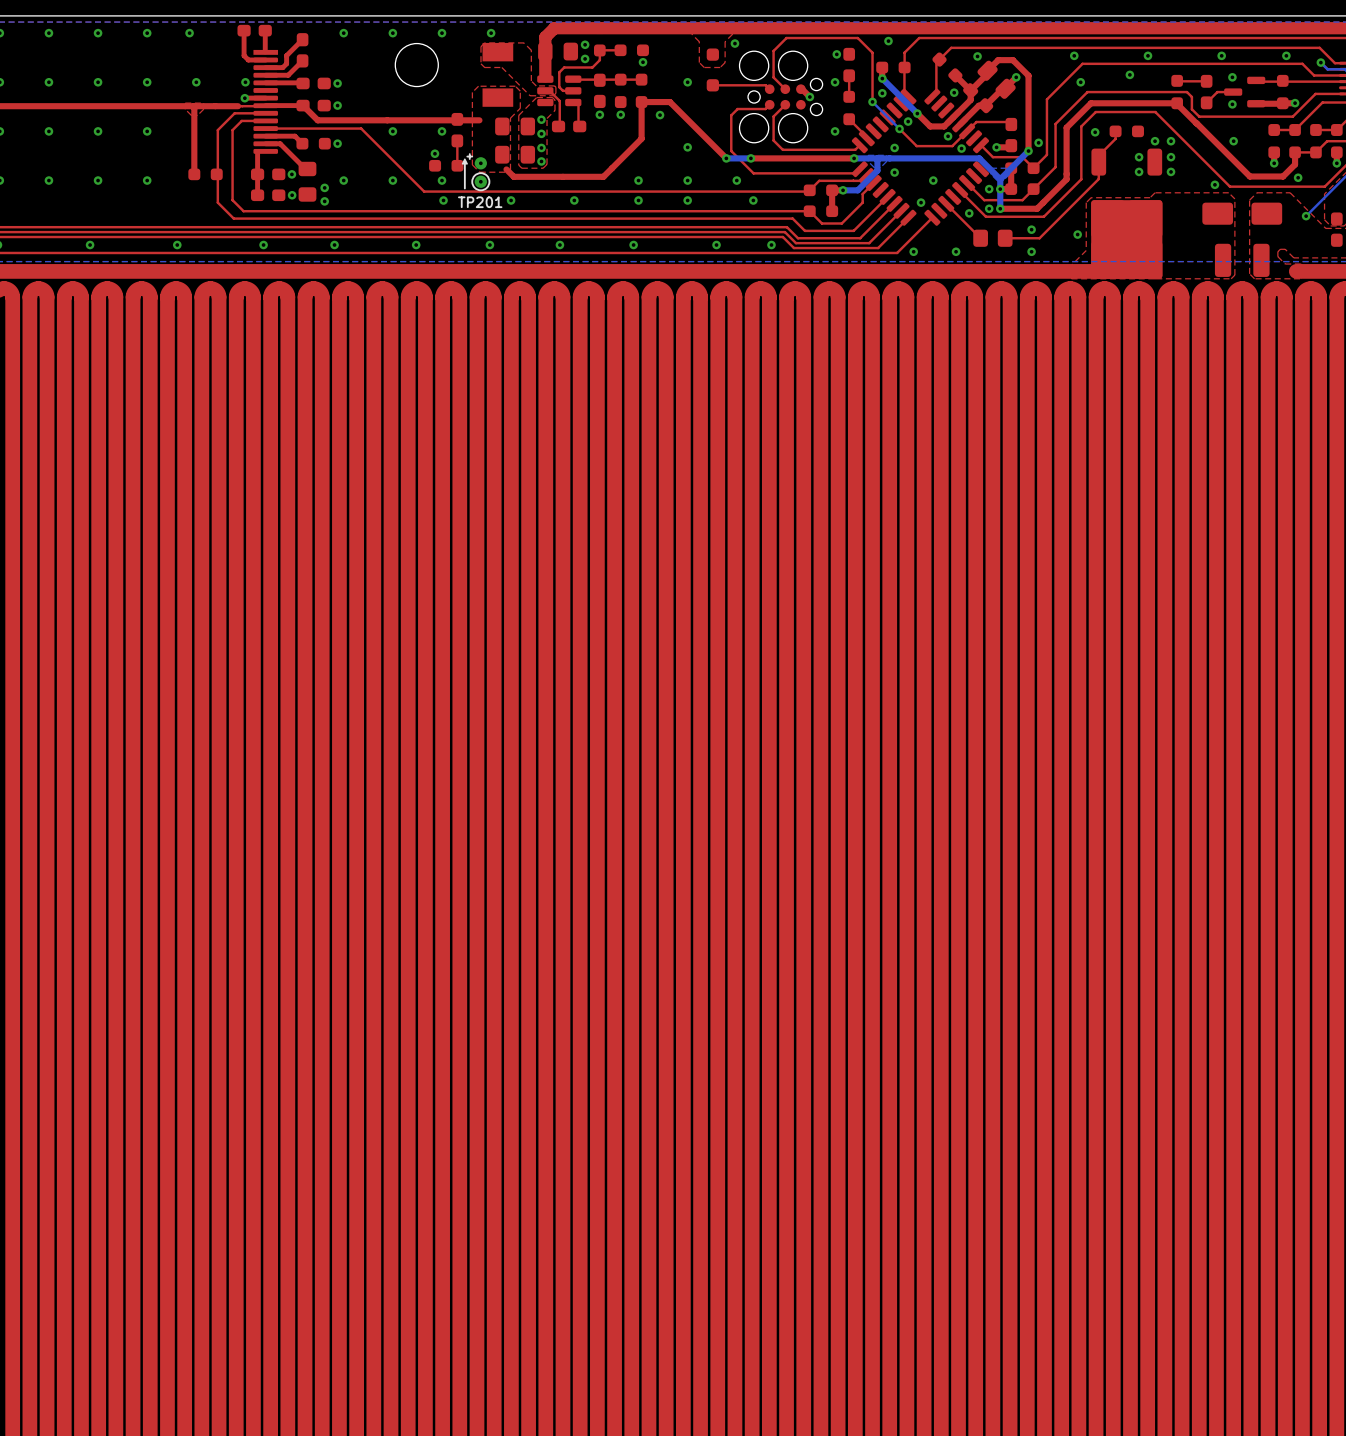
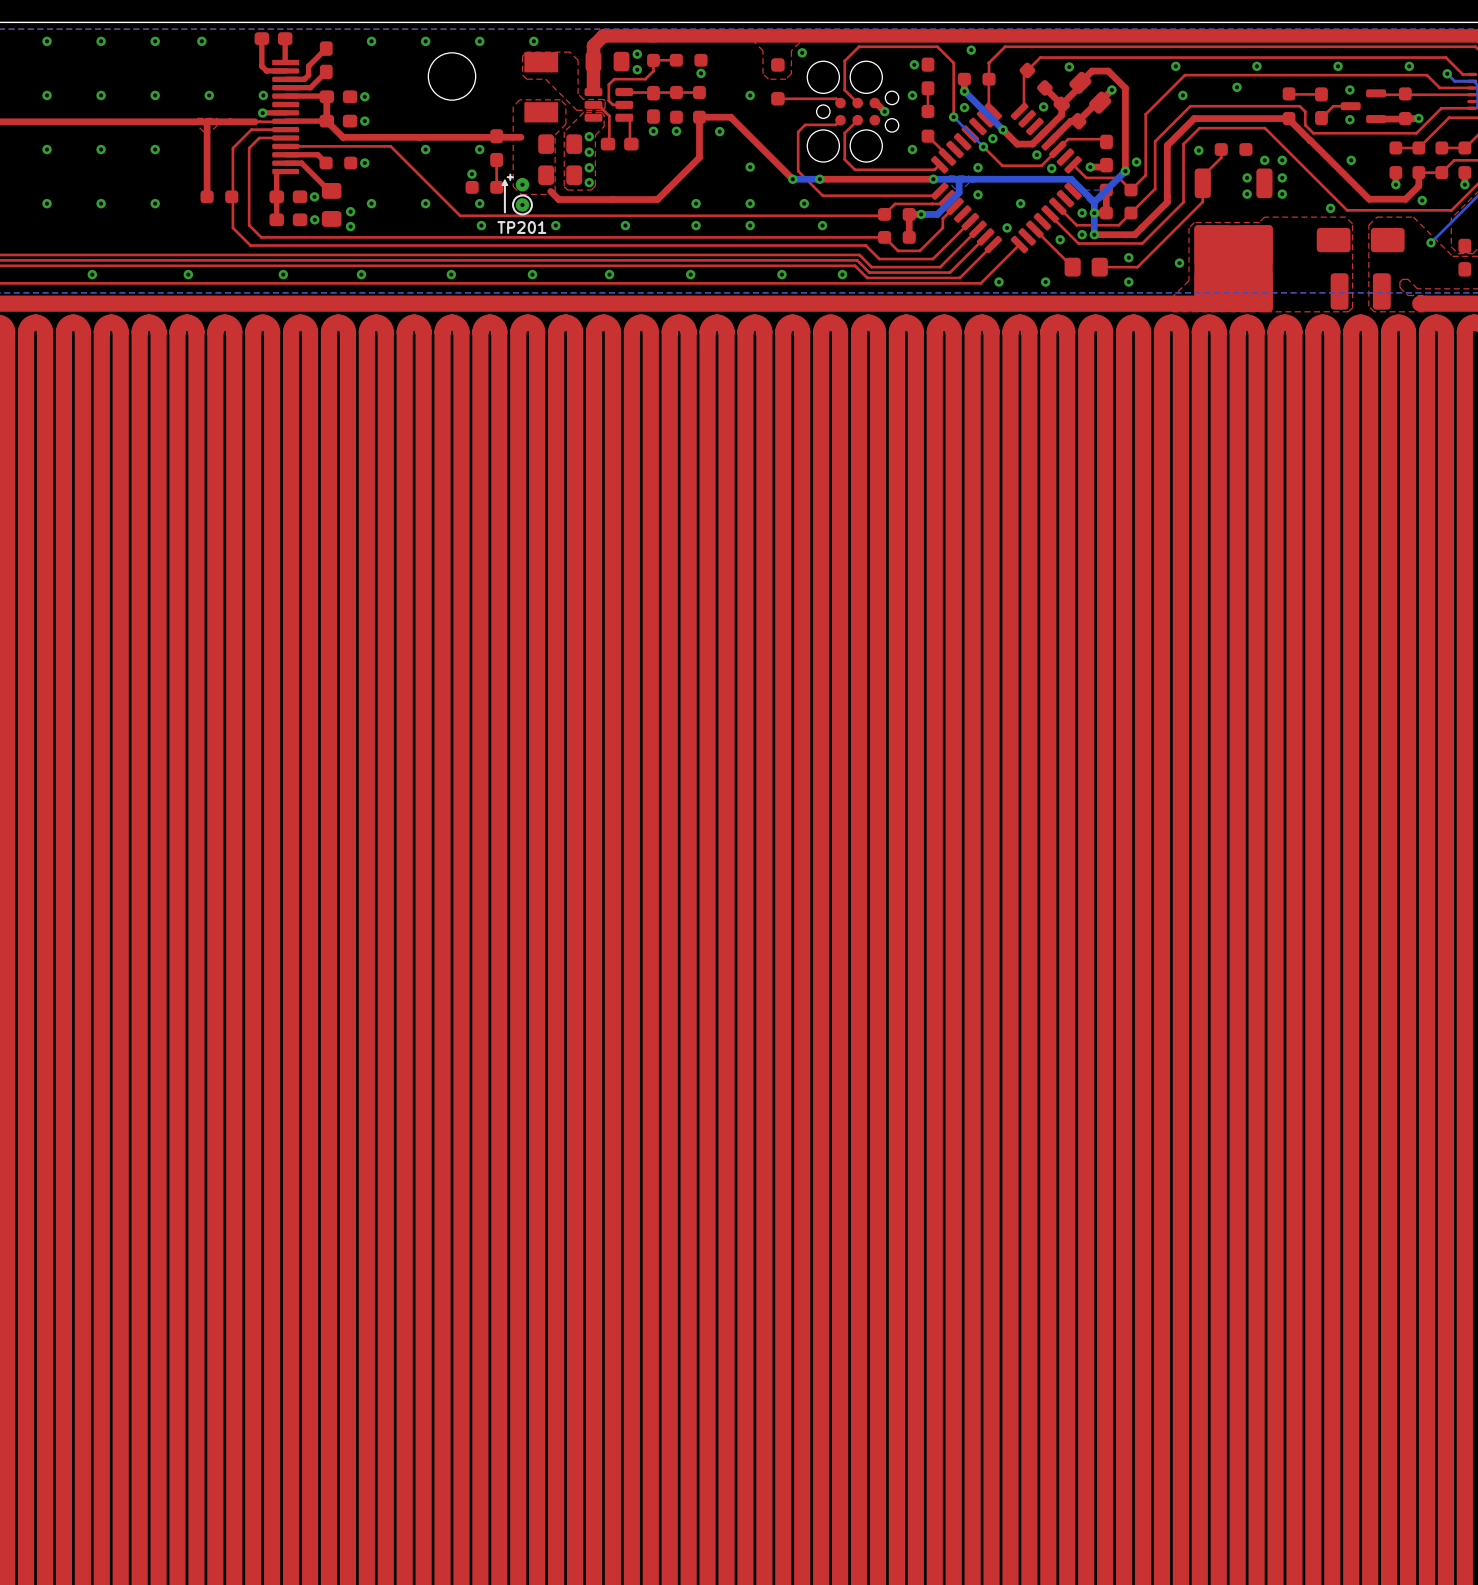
top track: none -> (326, 96) (326, 121)

